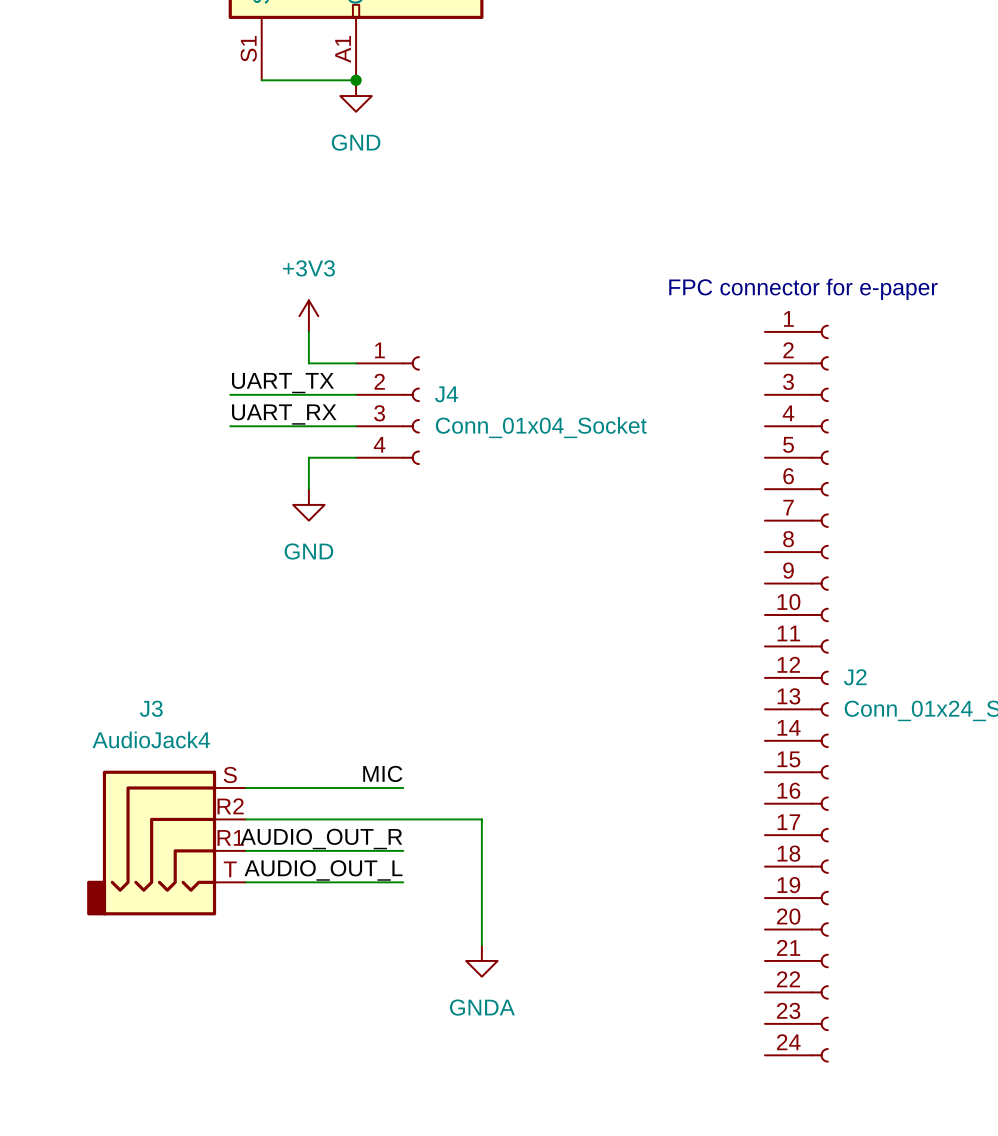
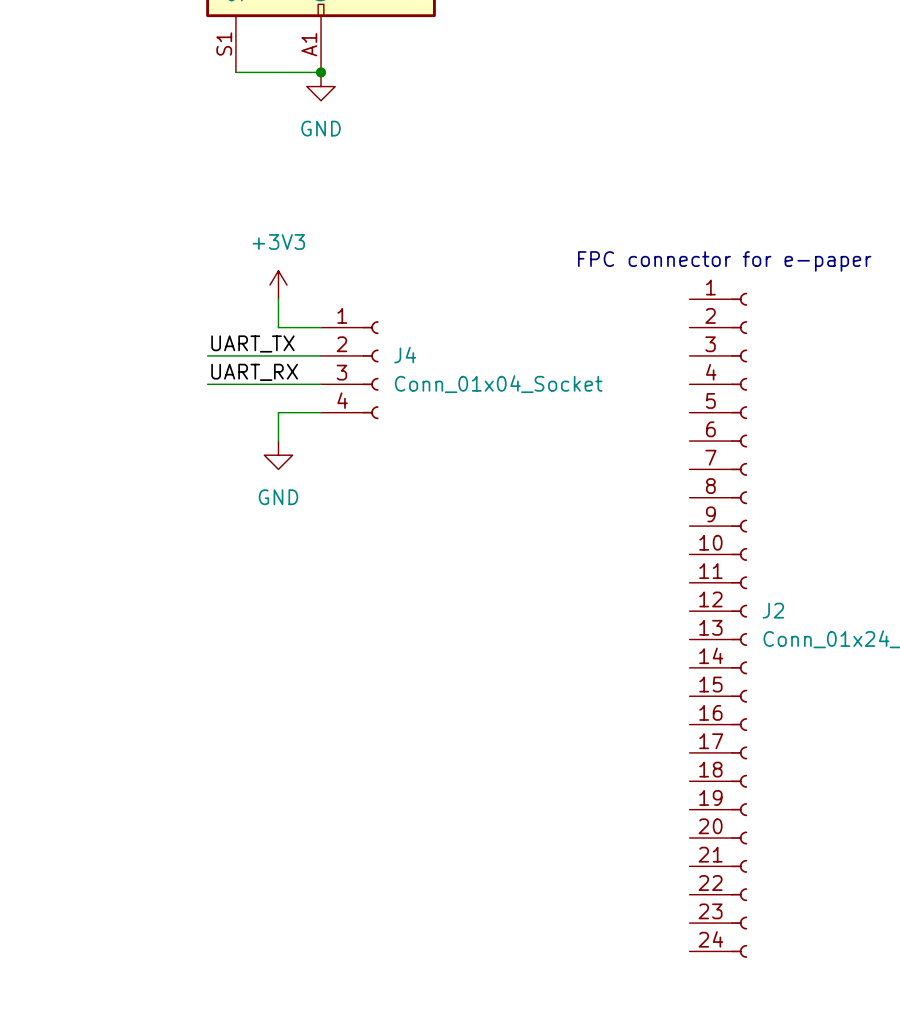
label: MIC (382, 773) -> none
wire: (245, 787) (403, 787) -> none
wire: (245, 819) (481, 819) (481, 945) -> none
label: AUDIO_OUT_R (321, 839) -> none
J3: AudioJack4 (166, 843) -> none
wire: (245, 850) (403, 850) -> none
label: AUDIO_OUT_L (323, 870) -> none
wire: (245, 882) (403, 882) -> none
power symbol: GNDA (481, 960) -> none

